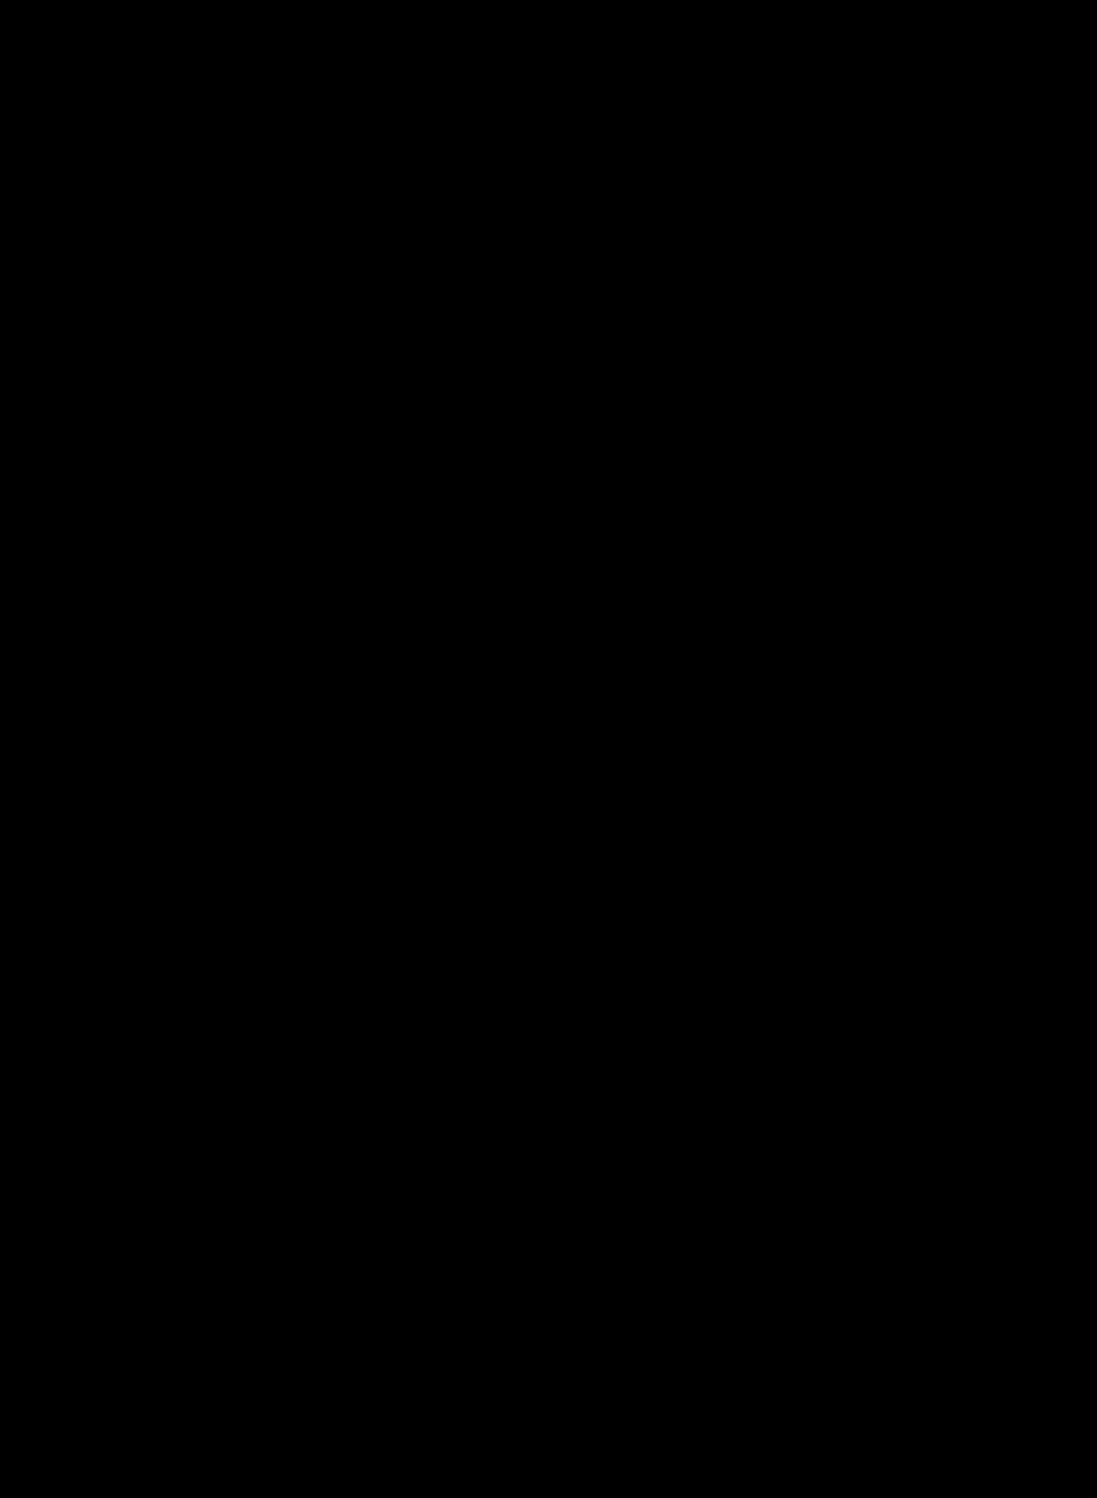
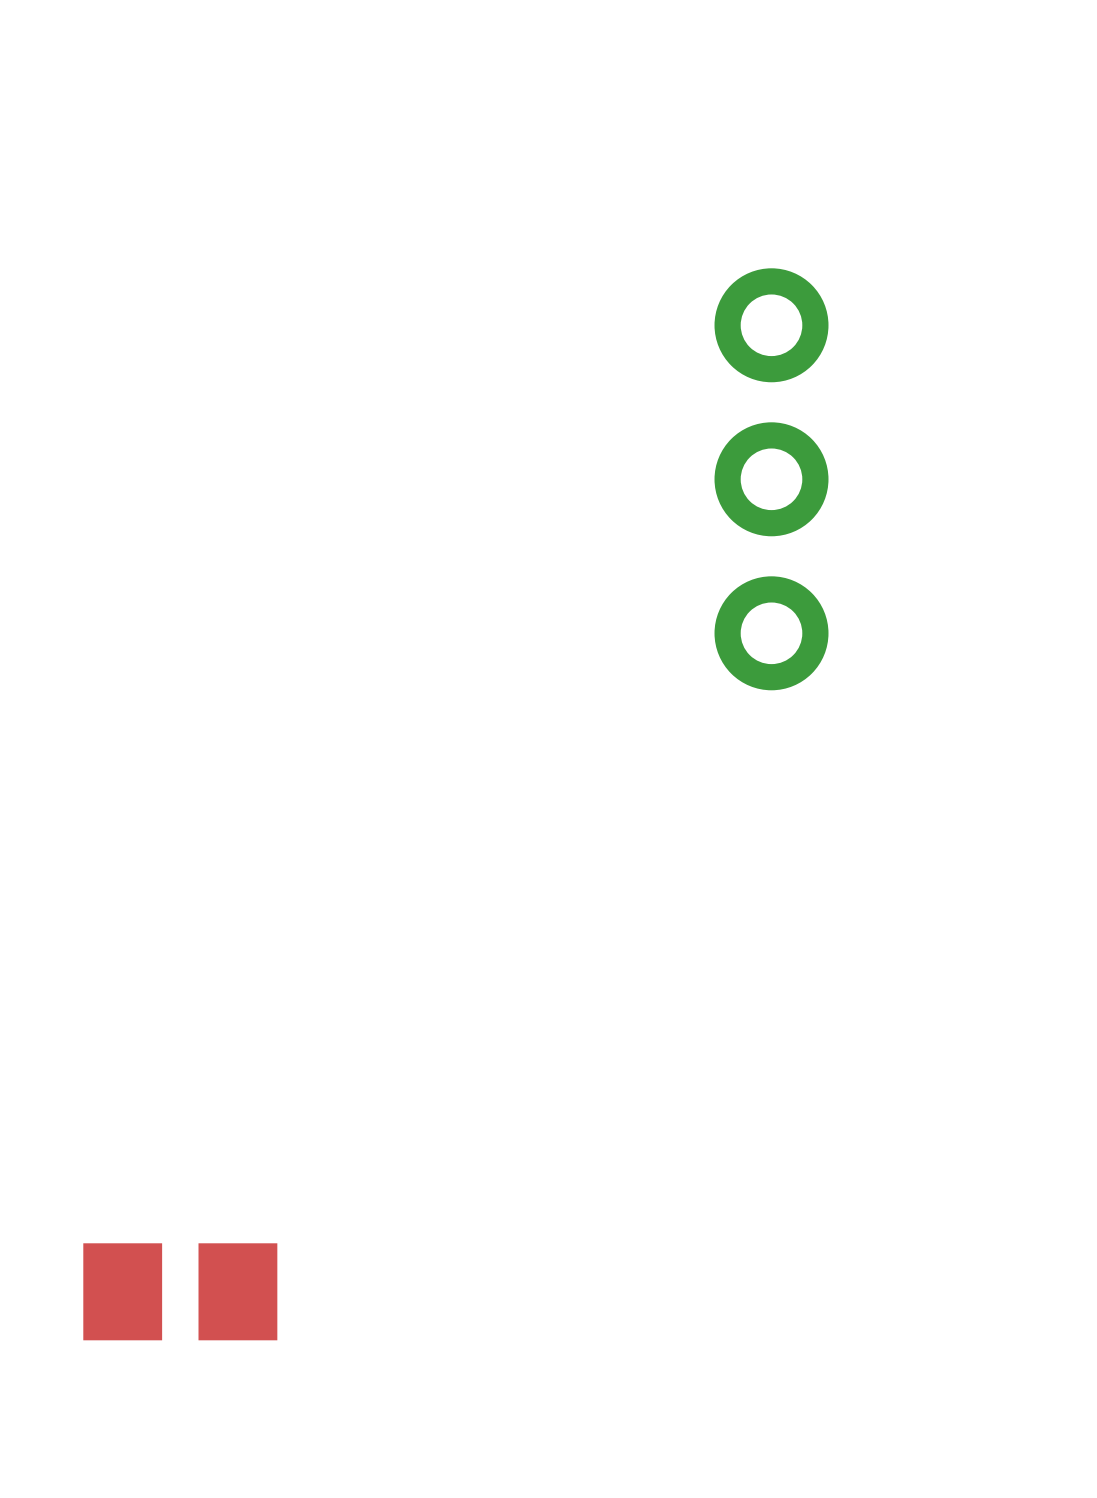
part: none -> (771, 479)
part: none -> (180, 1291)

